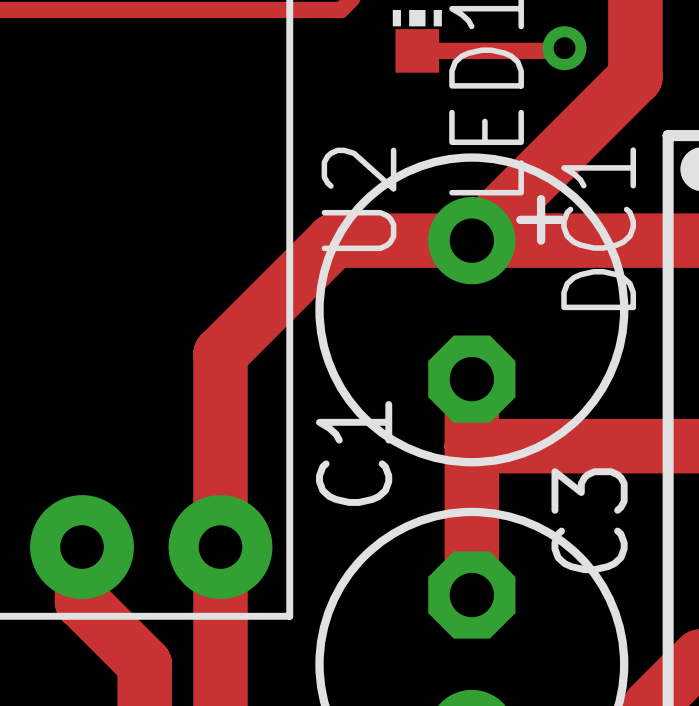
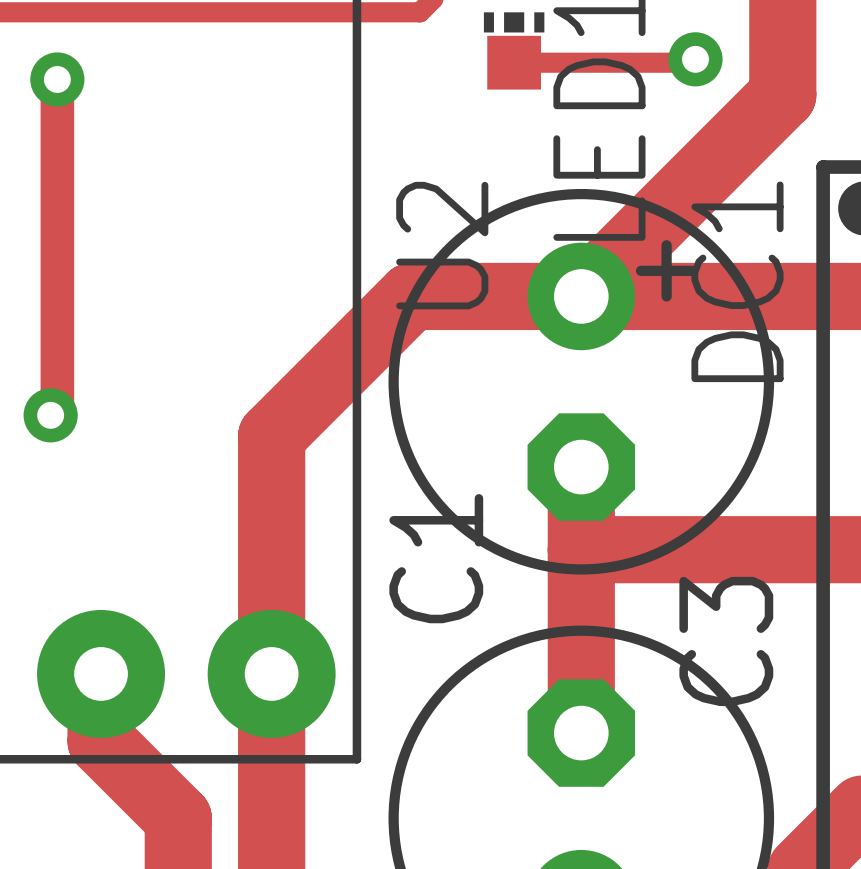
track: none -> (57, 79) (57, 408) (50, 415)
via: none -> (57, 79)
via: none -> (50, 415)

